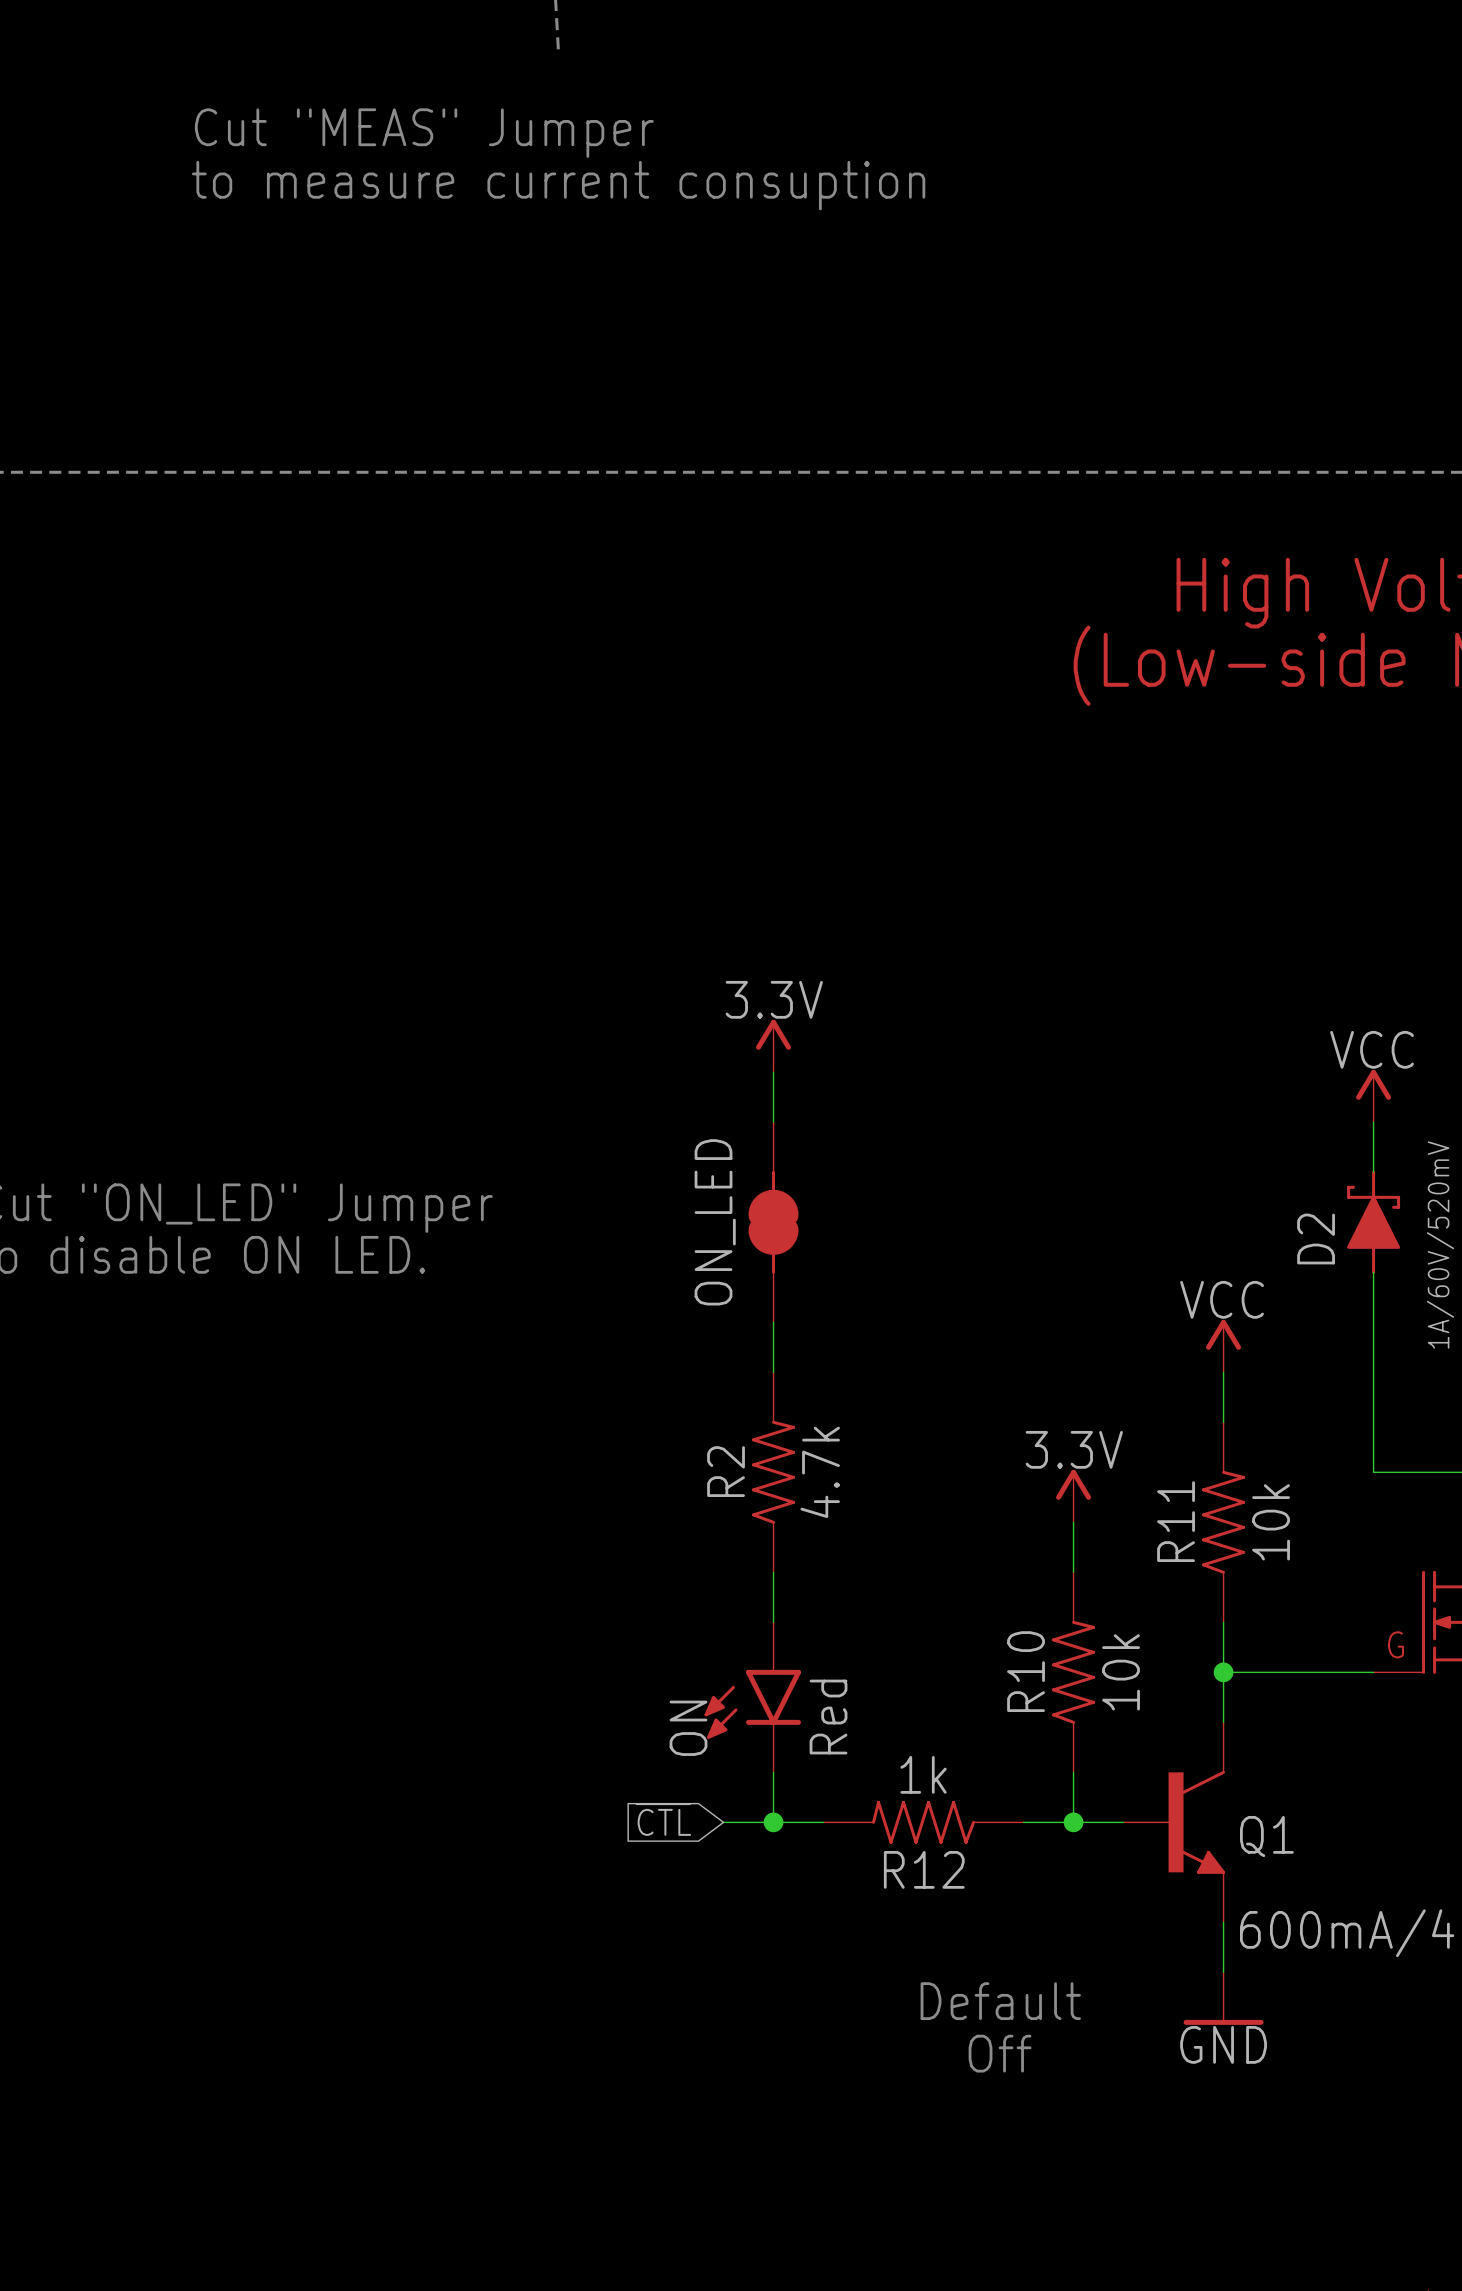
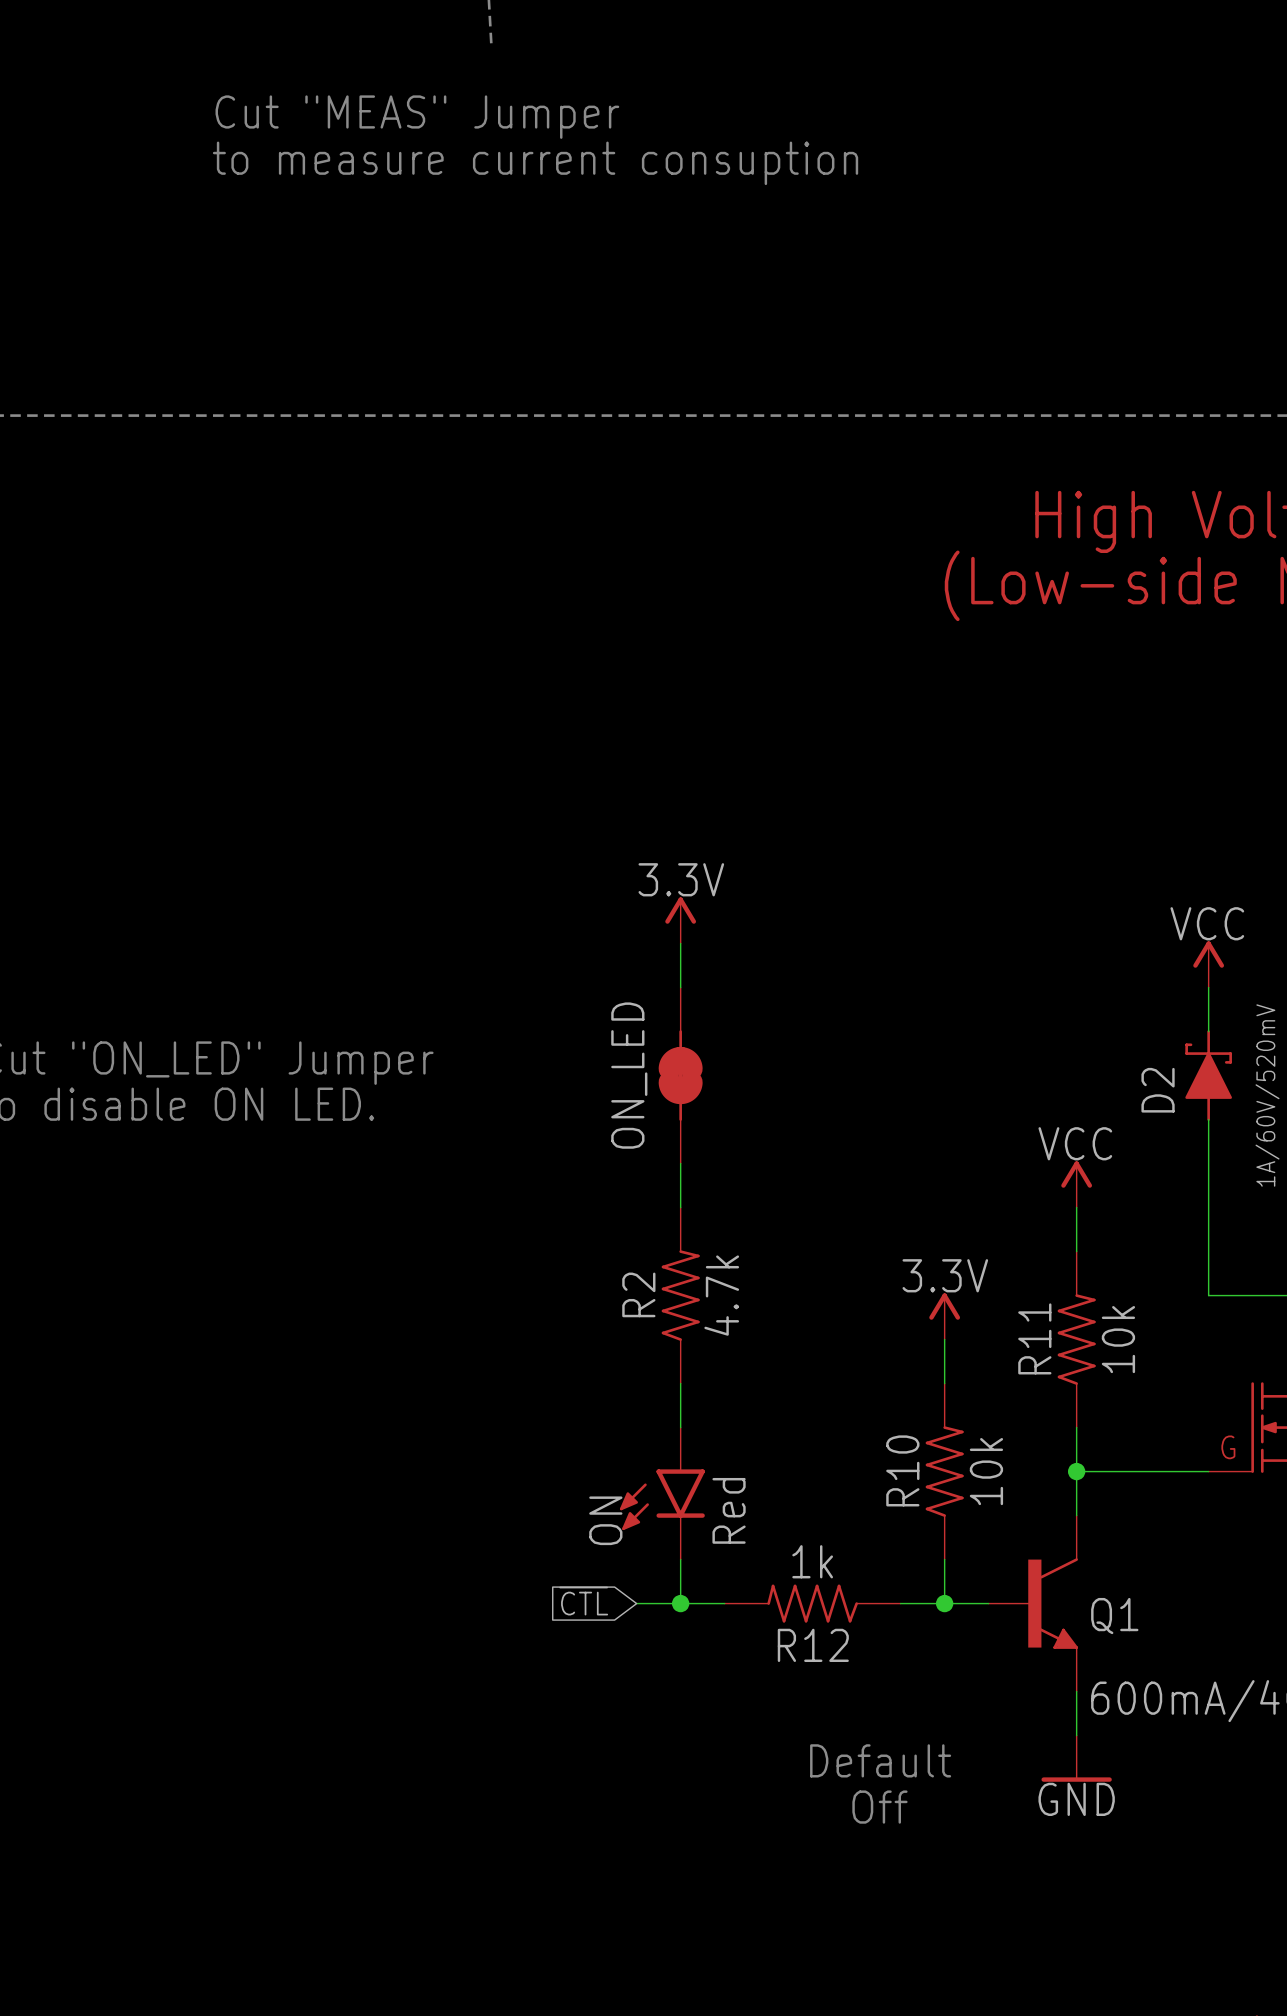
text position: Cut "MEAS" Jumper (424, 133) -> Cut "MEAS" Jumper (417, 117)
text position: to measure current consuption (558, 185) -> to measure current consuption (535, 163)

